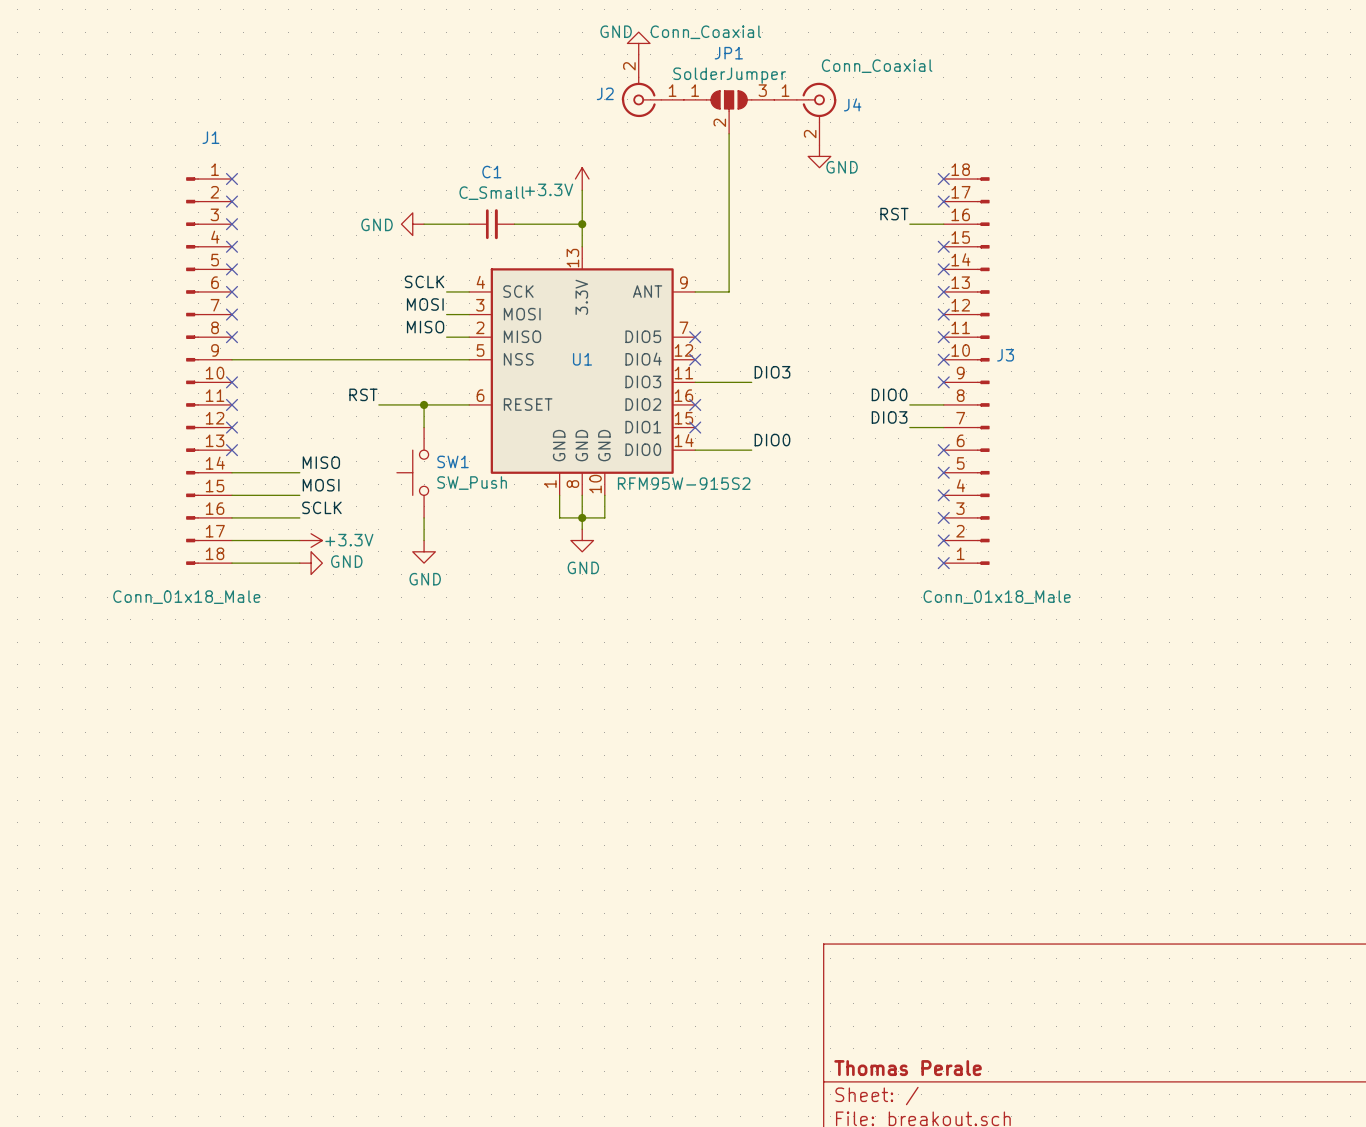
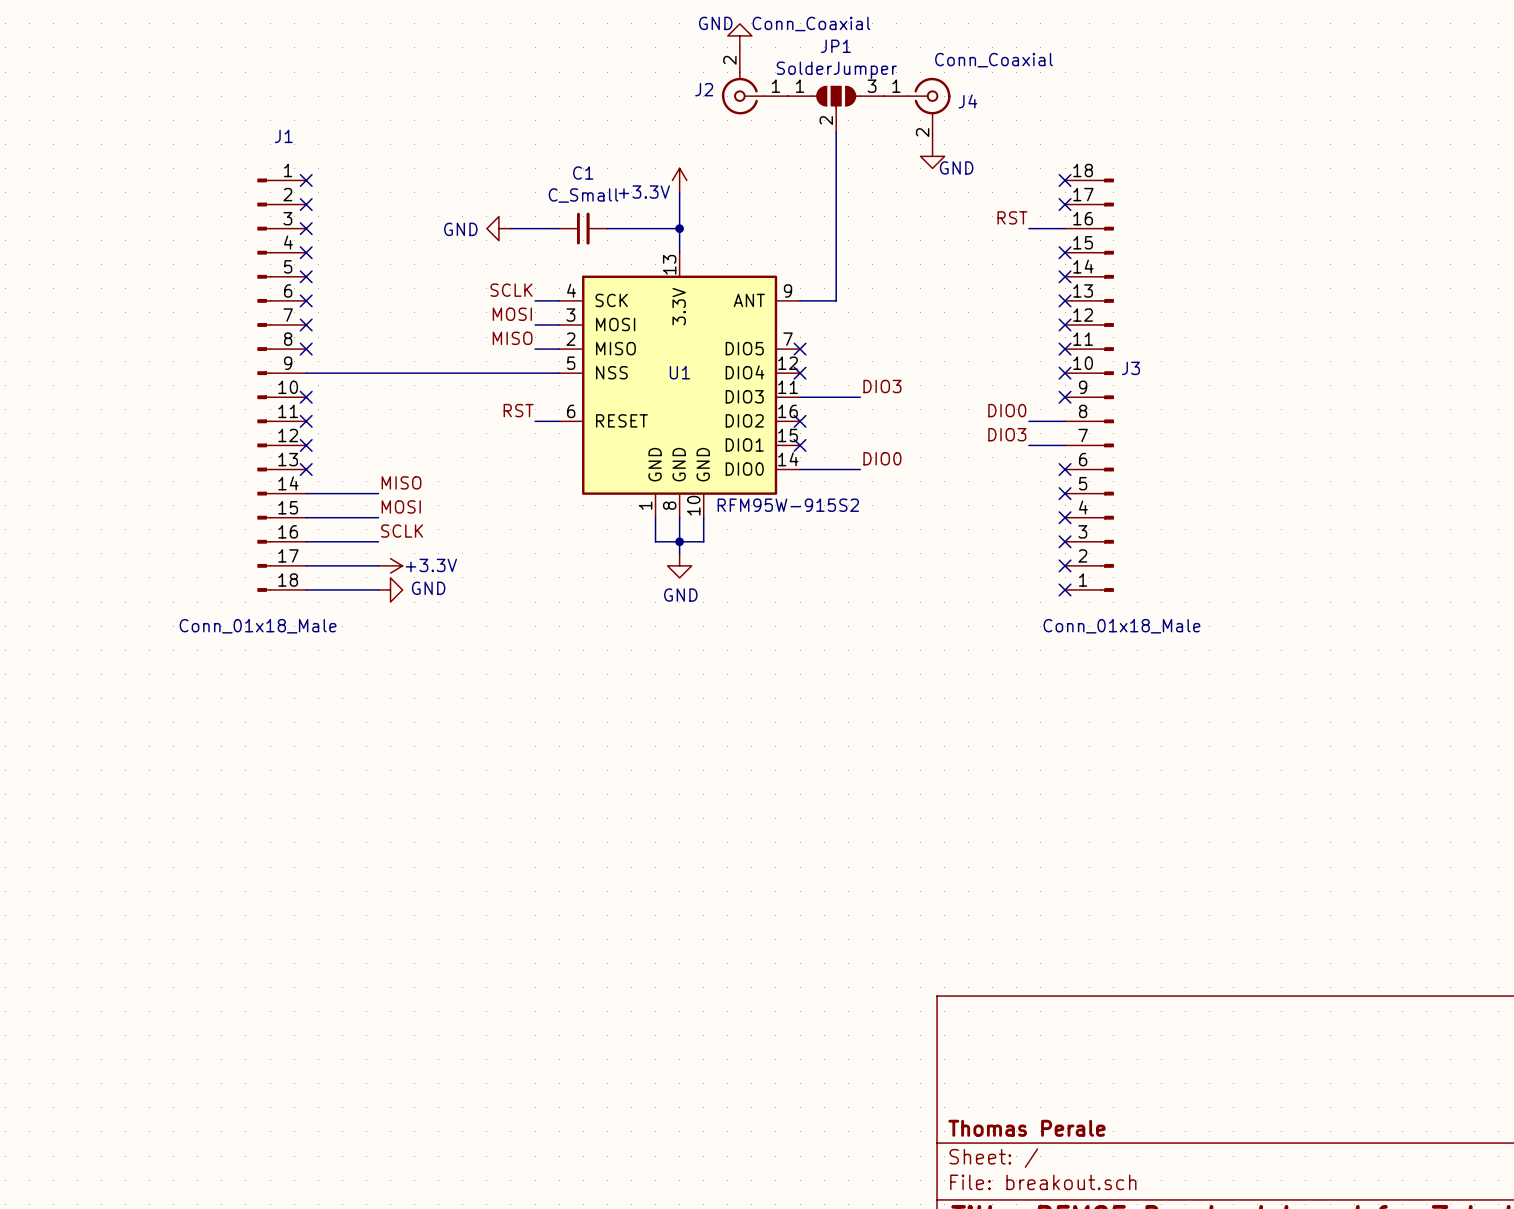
label position: RST (363, 394) -> RST (518, 410)
wire: (378, 404) (446, 404) -> none
wire: (424, 404) (424, 427) -> none
junction: (424, 404) -> none
SW1: SW_Push (412, 472) -> none
wire: (424, 517) (424, 540) -> none
power symbol: GND (424, 551) -> none

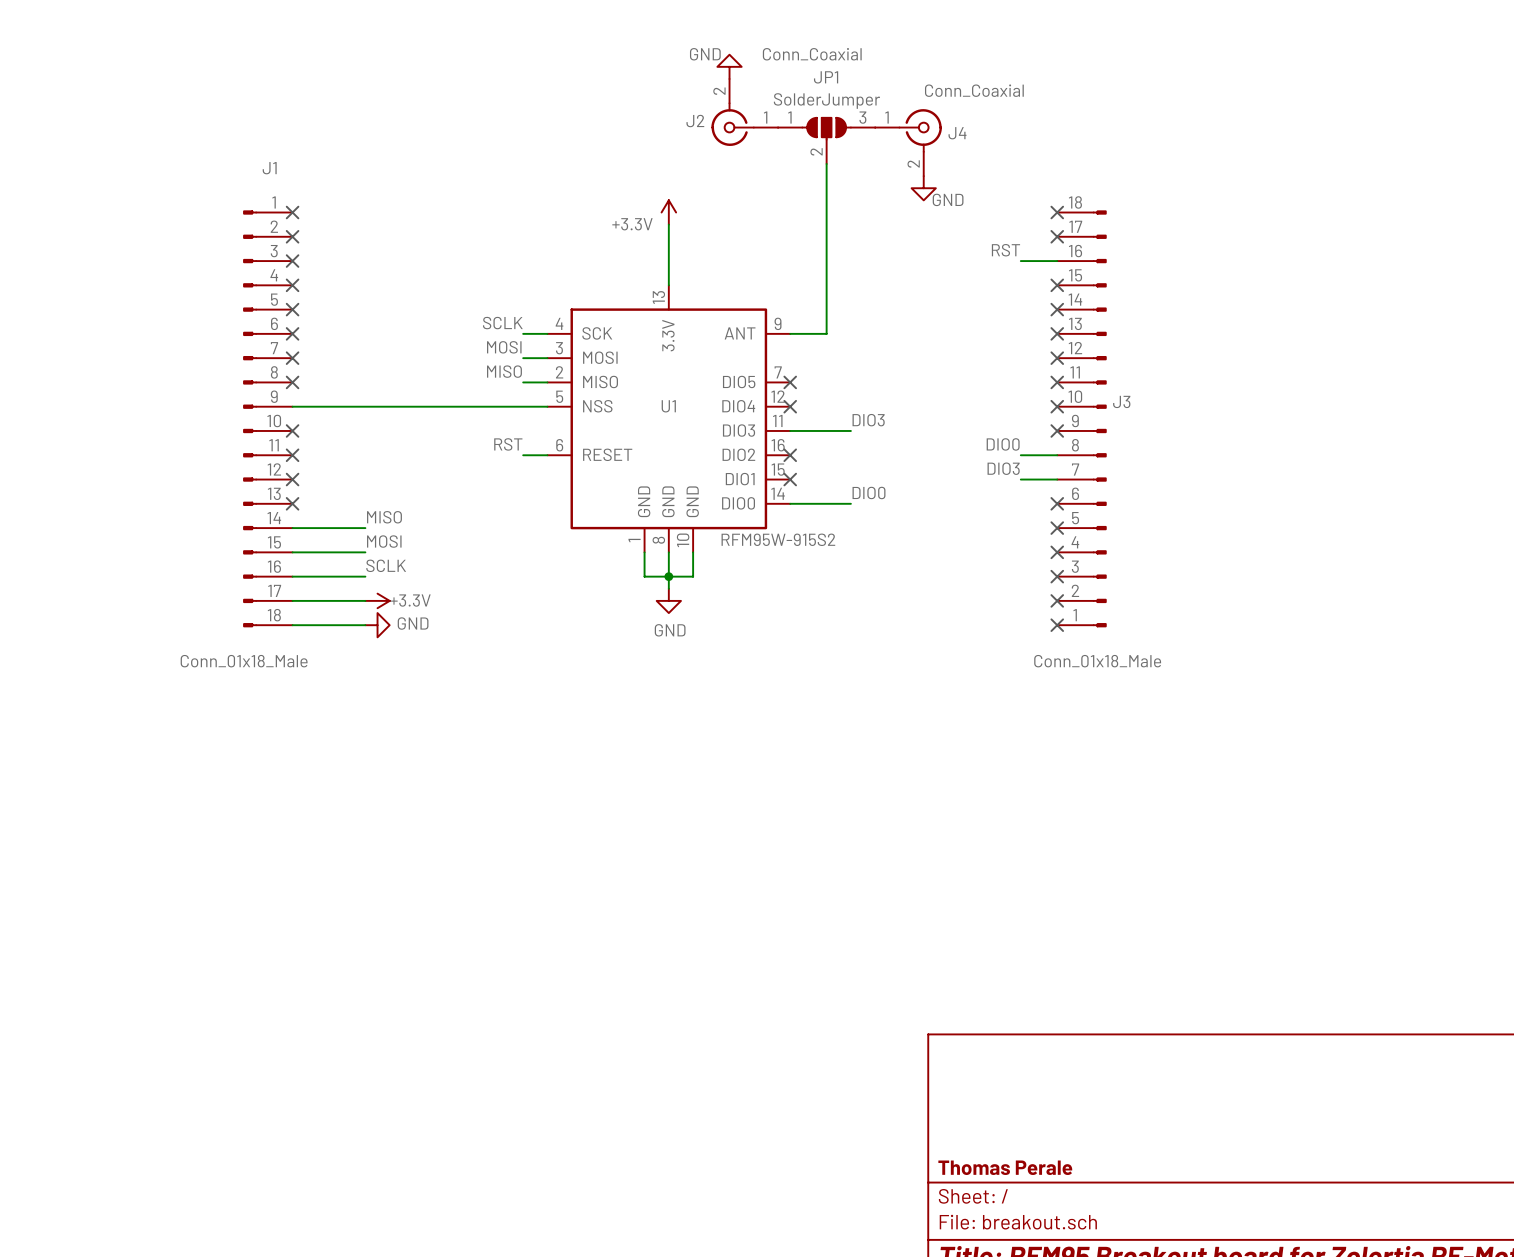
power symbol: GND (498, 228) -> none
wire: (510, 228) (559, 228) -> none
C1: C_Small (583, 228) -> none
wire: (607, 228) (679, 228) -> none
junction: (679, 228) -> none

